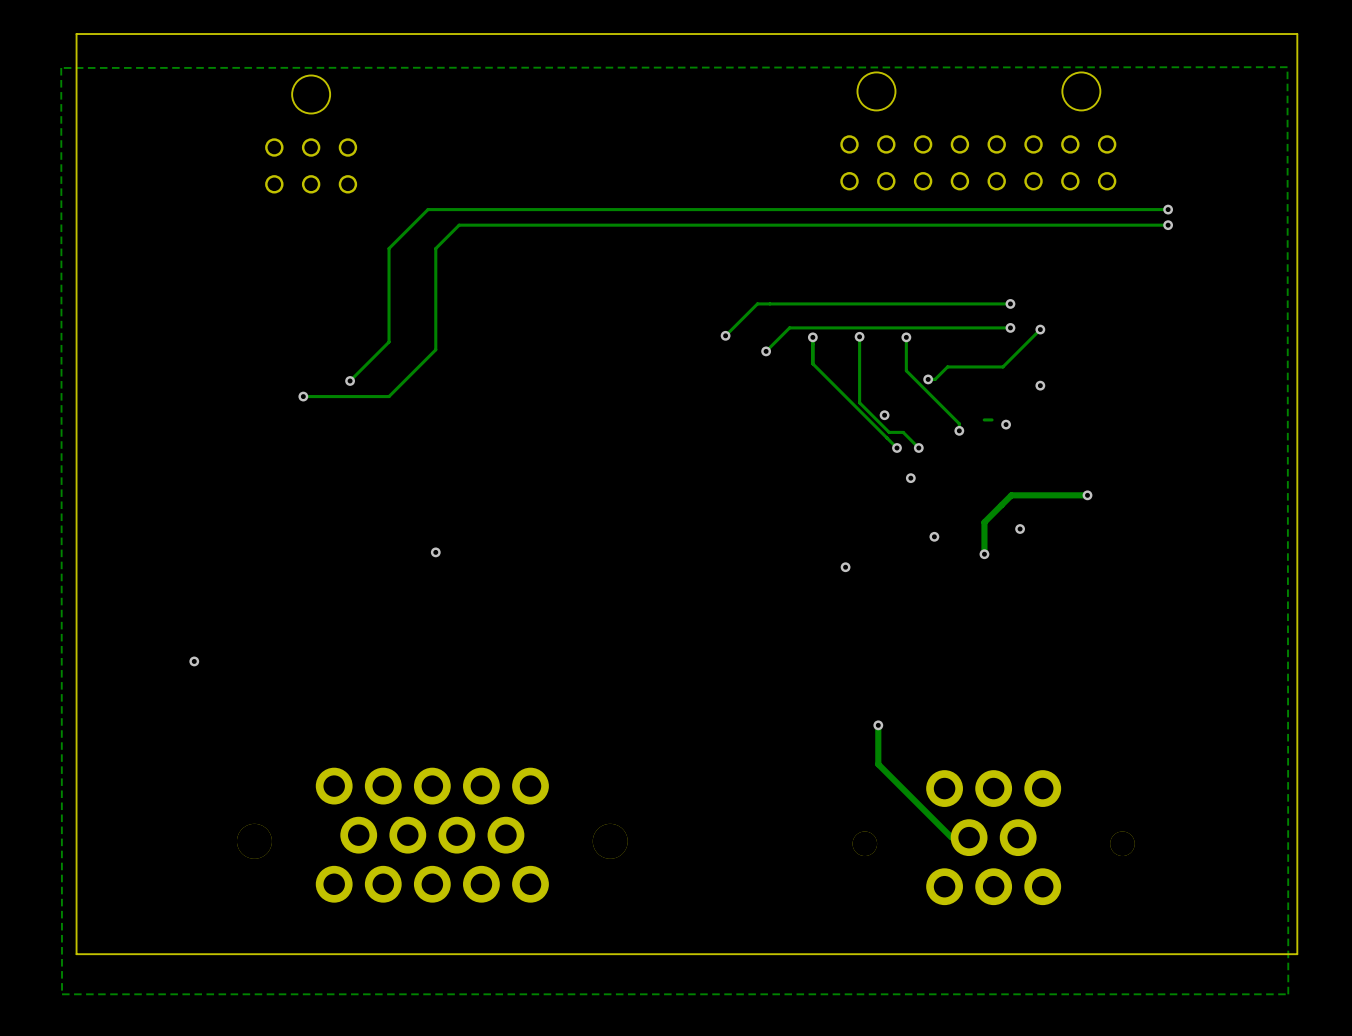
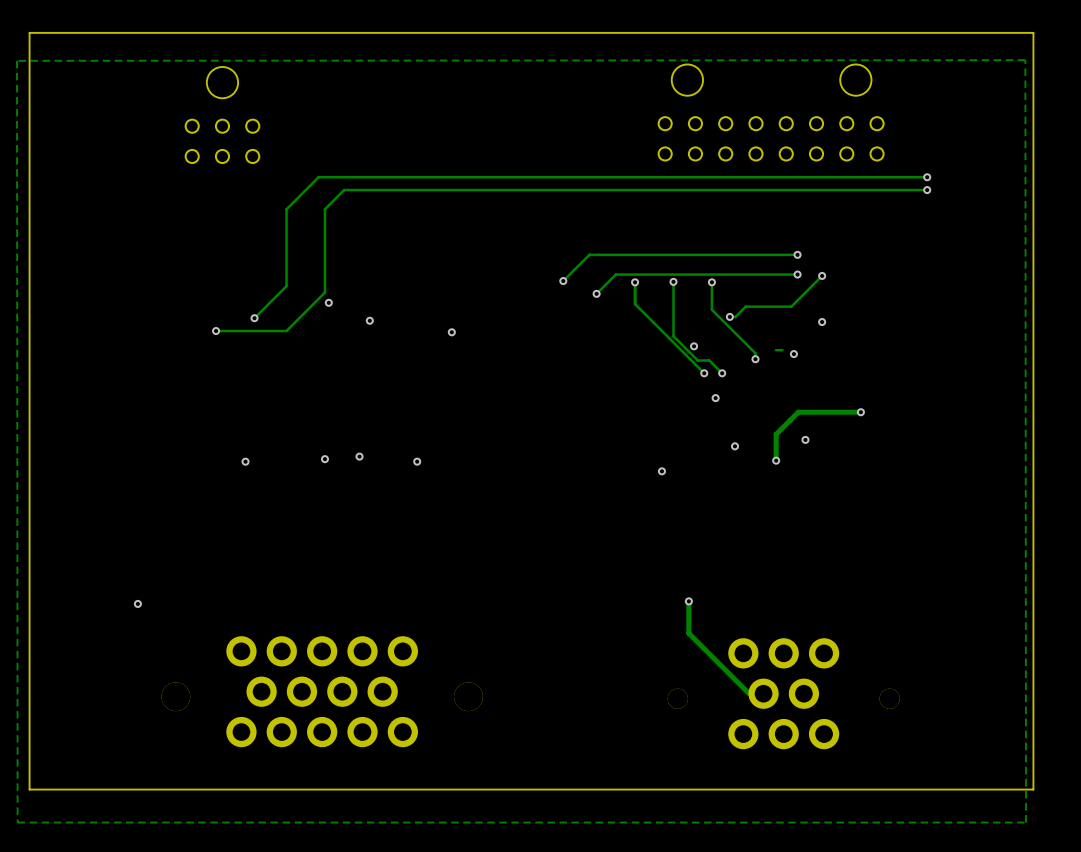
via: none -> (328, 302)
via: none -> (369, 320)
via: none -> (451, 332)
via: none -> (359, 456)
via: none -> (245, 461)
via: none -> (417, 461)
via position: (194, 661) -> (137, 603)

